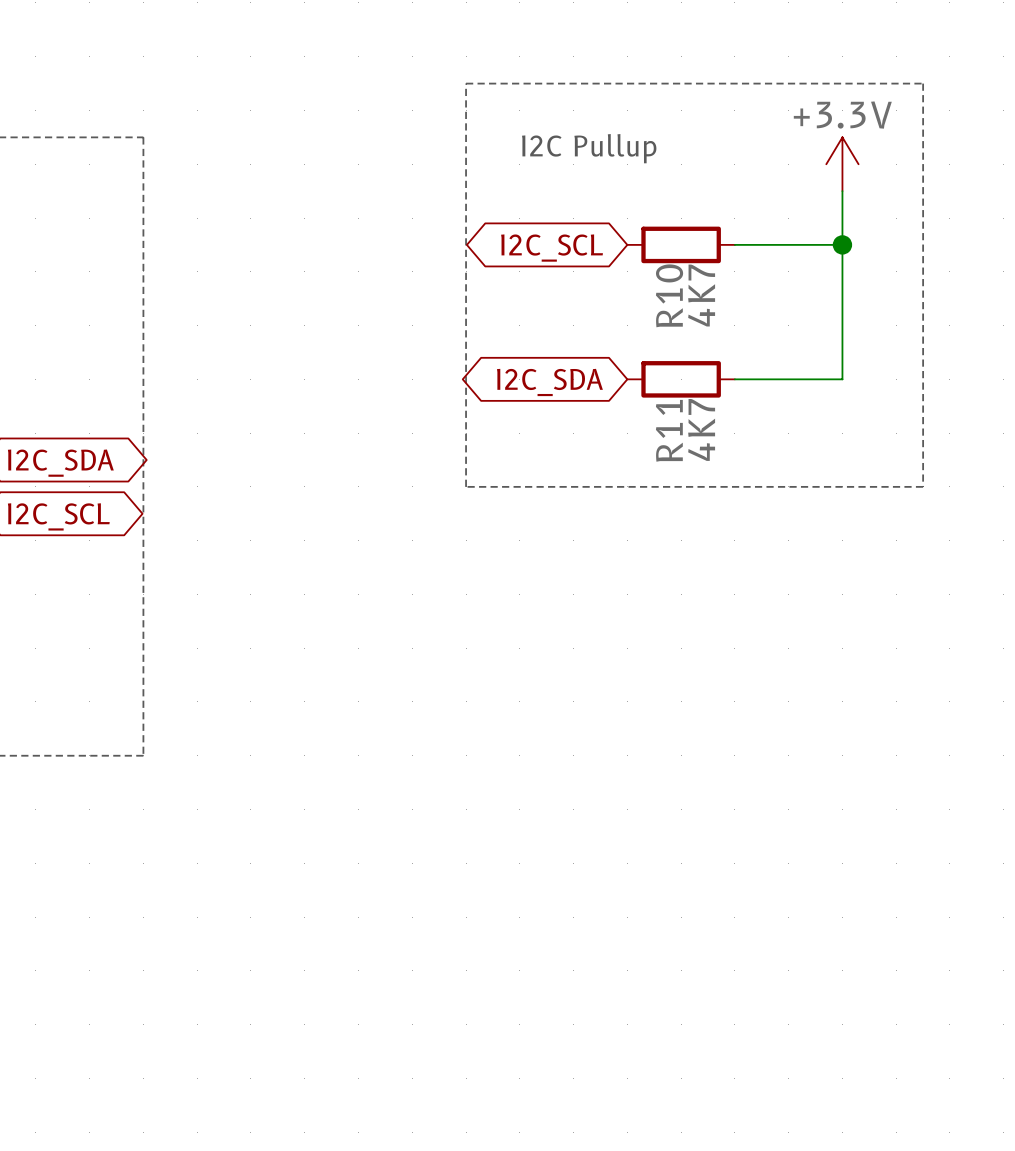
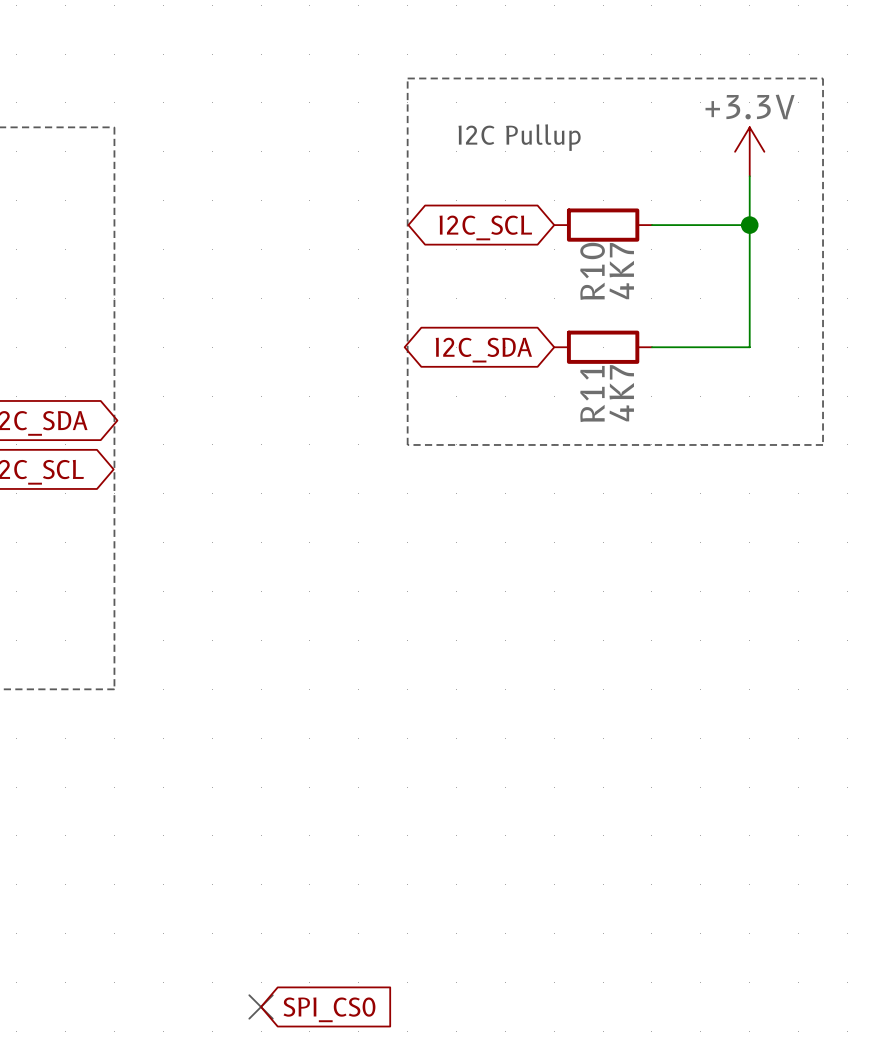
no-connect mark: none -> (261, 1006)
global label: none -> SPI_CS0 (329, 1009)

